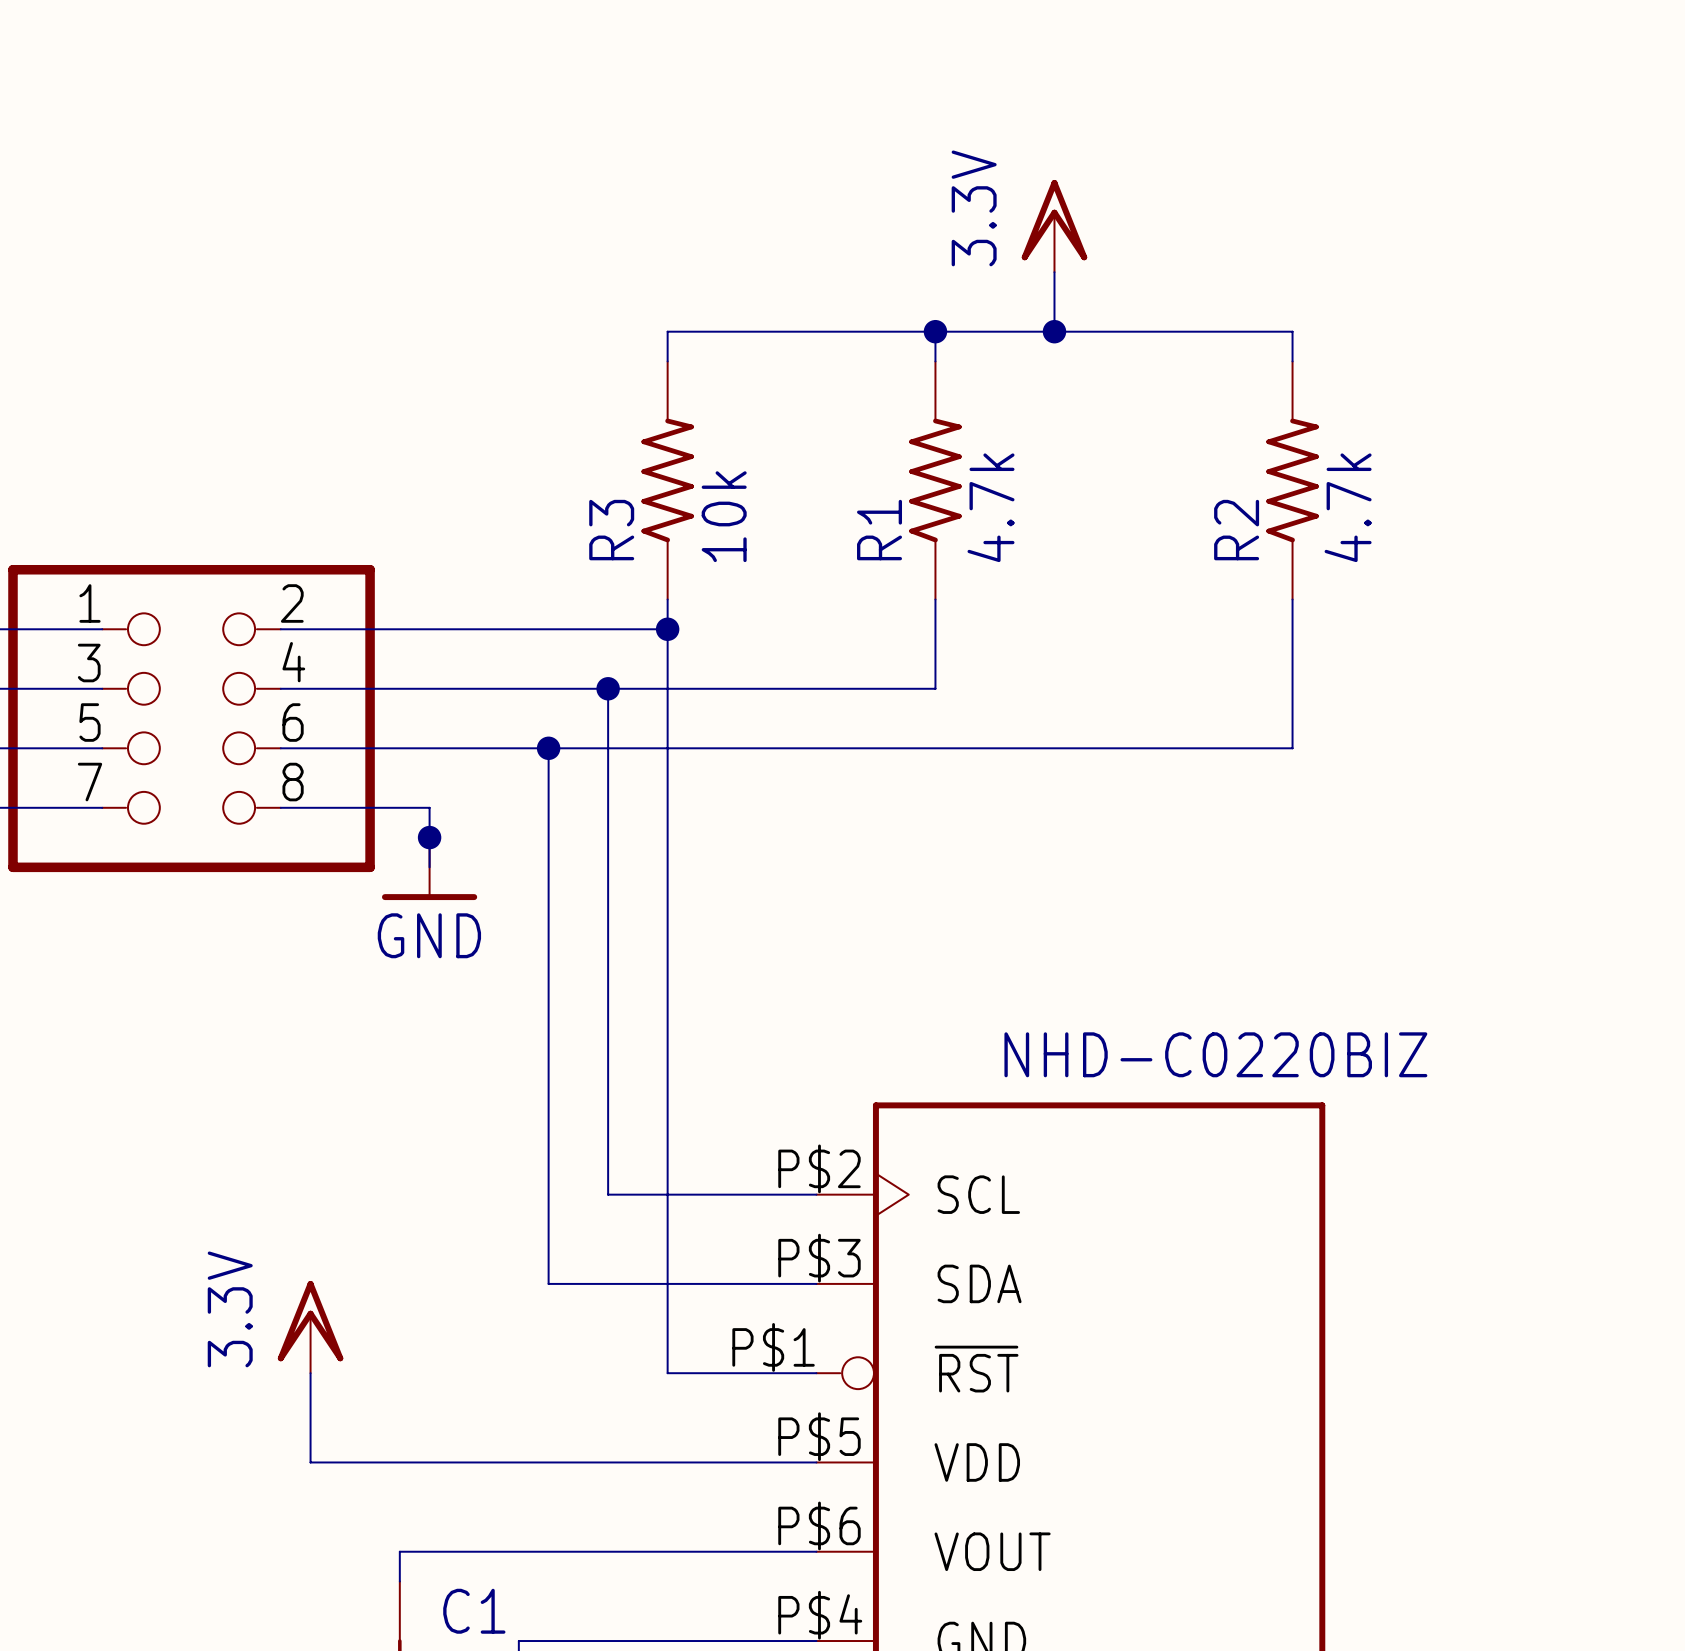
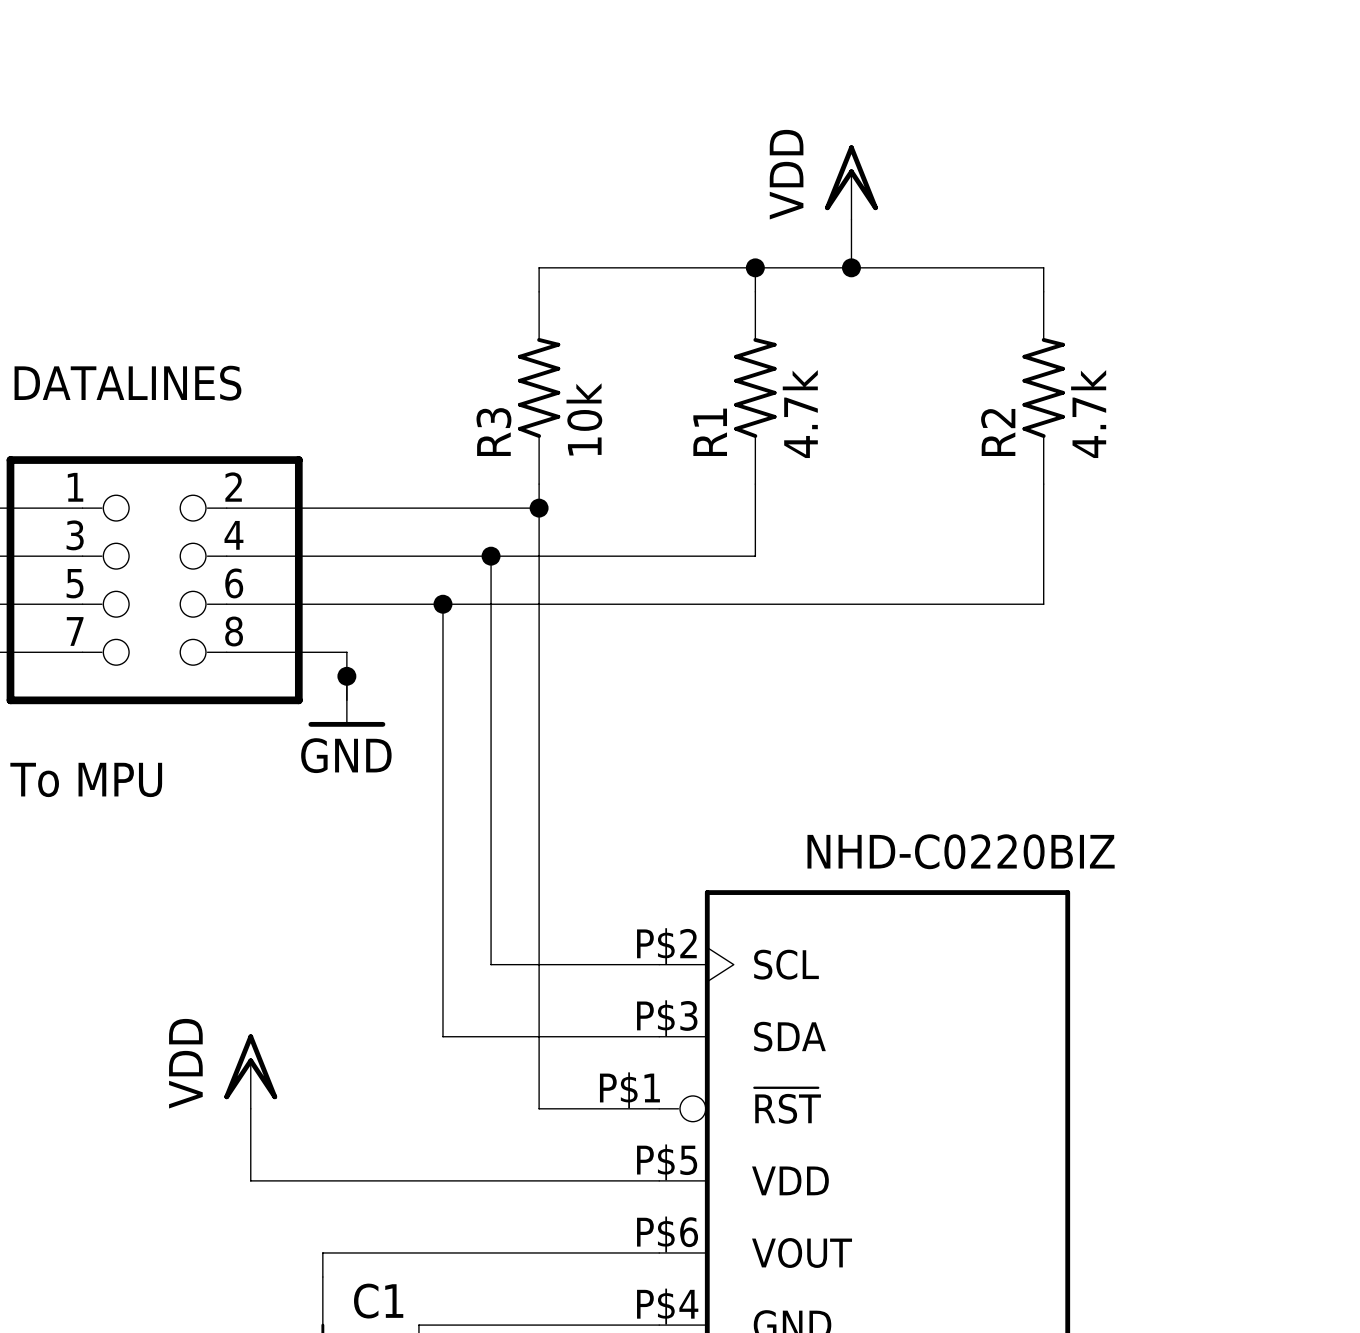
power symbol: 3.3V (1054, 226) -> VDD (851, 182)
DATALINES name: none -> DATALINES (127, 383)
DATALINES value: none -> To MPU (86, 779)
power symbol: 3.3V (310, 1327) -> VDD (250, 1071)

